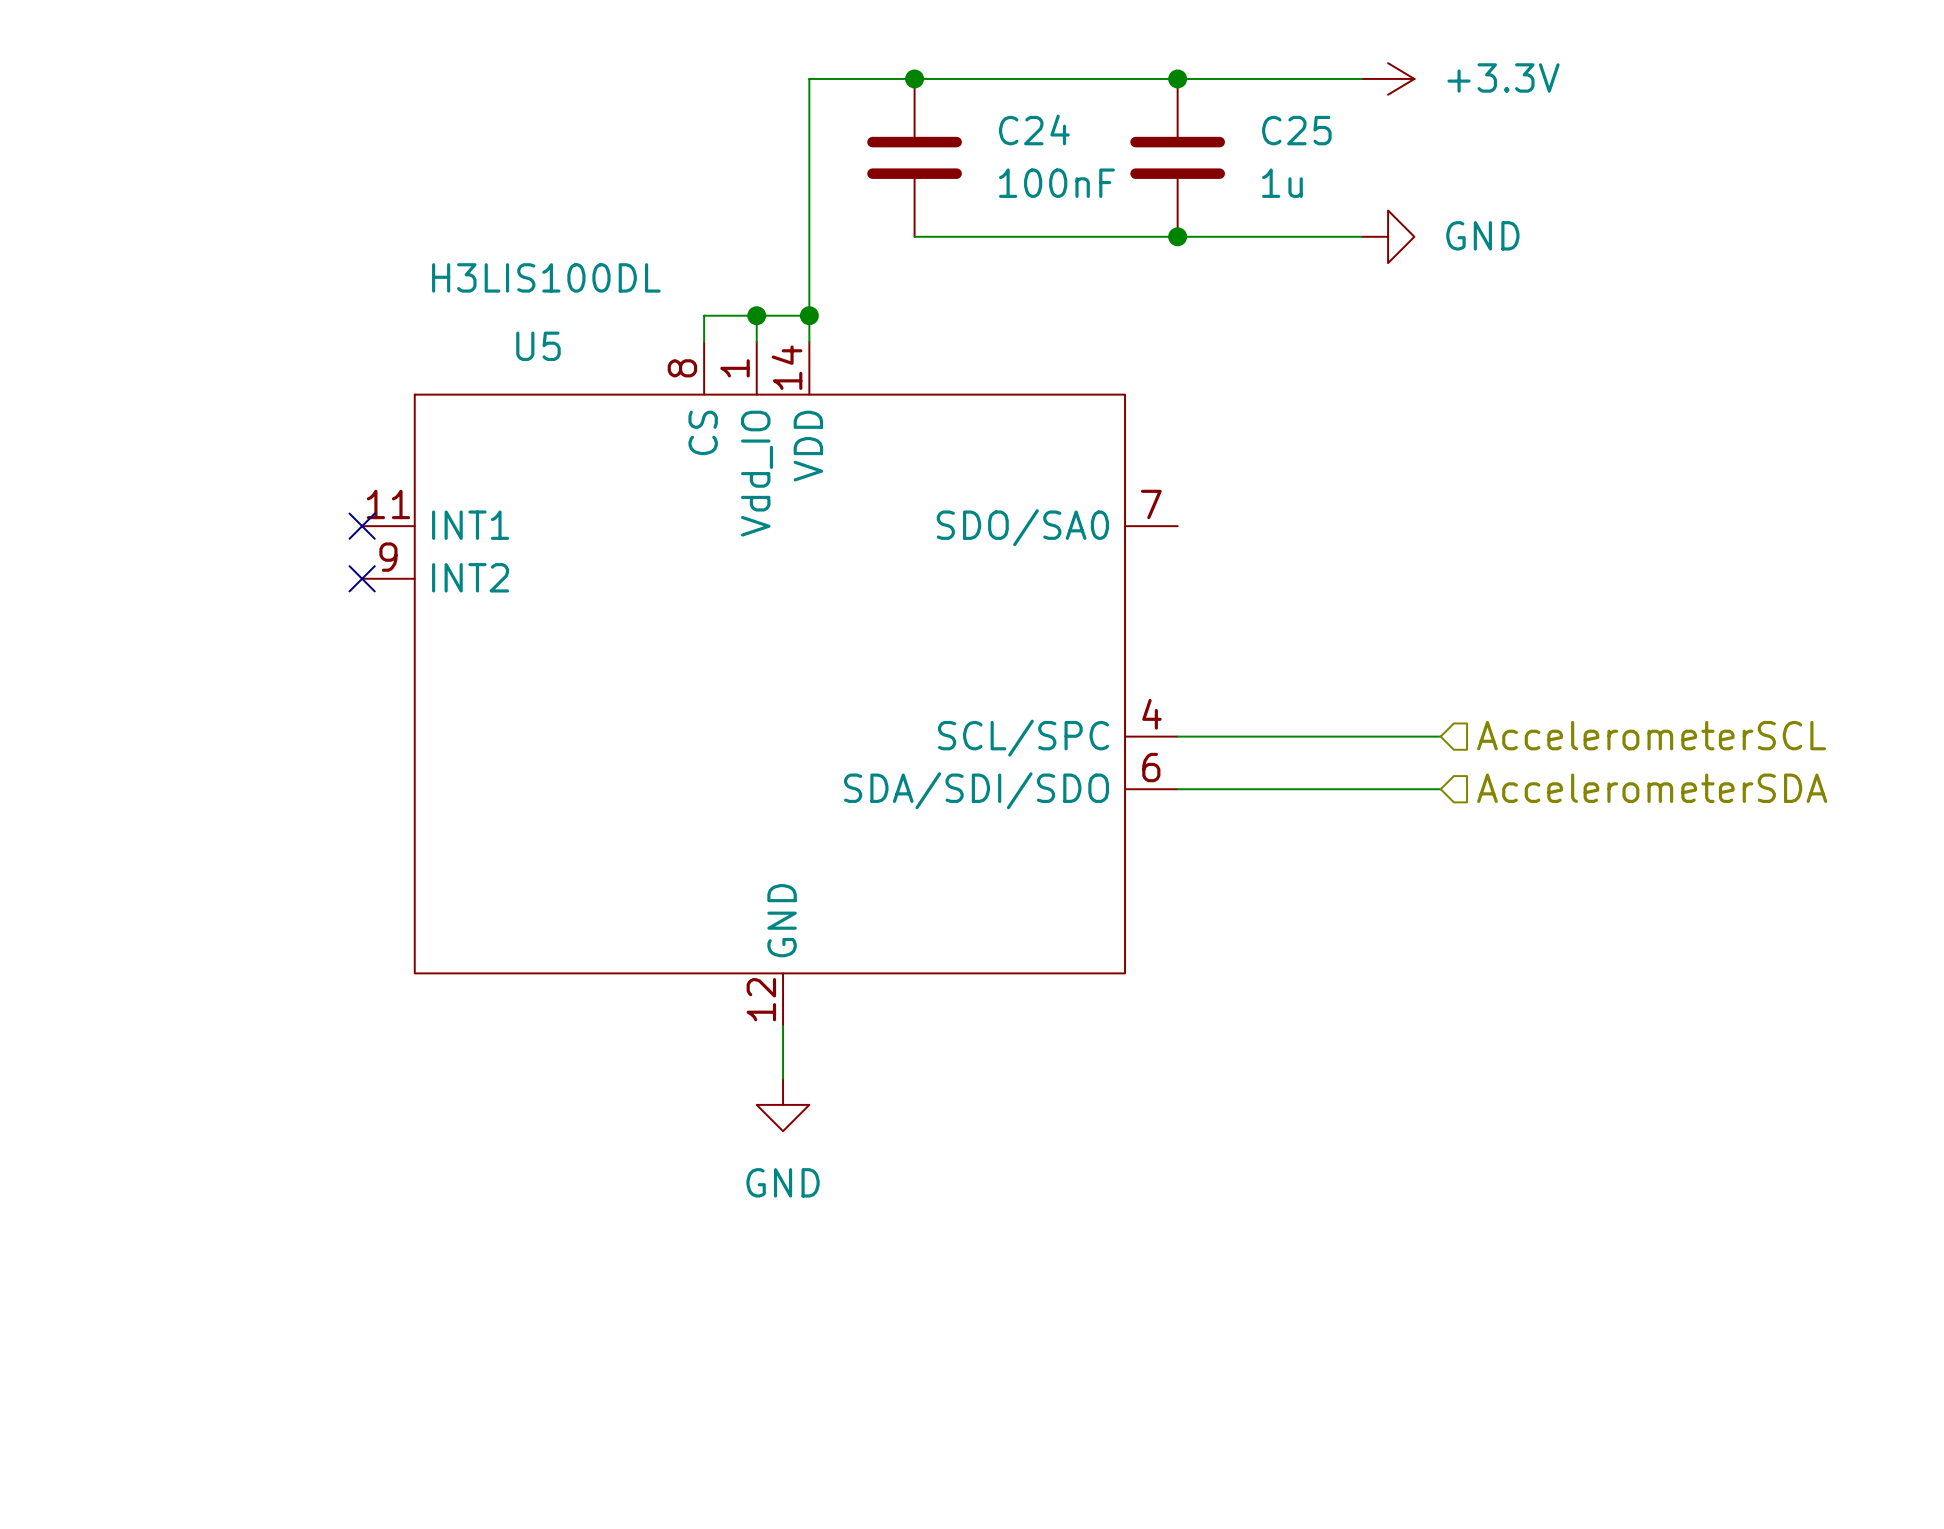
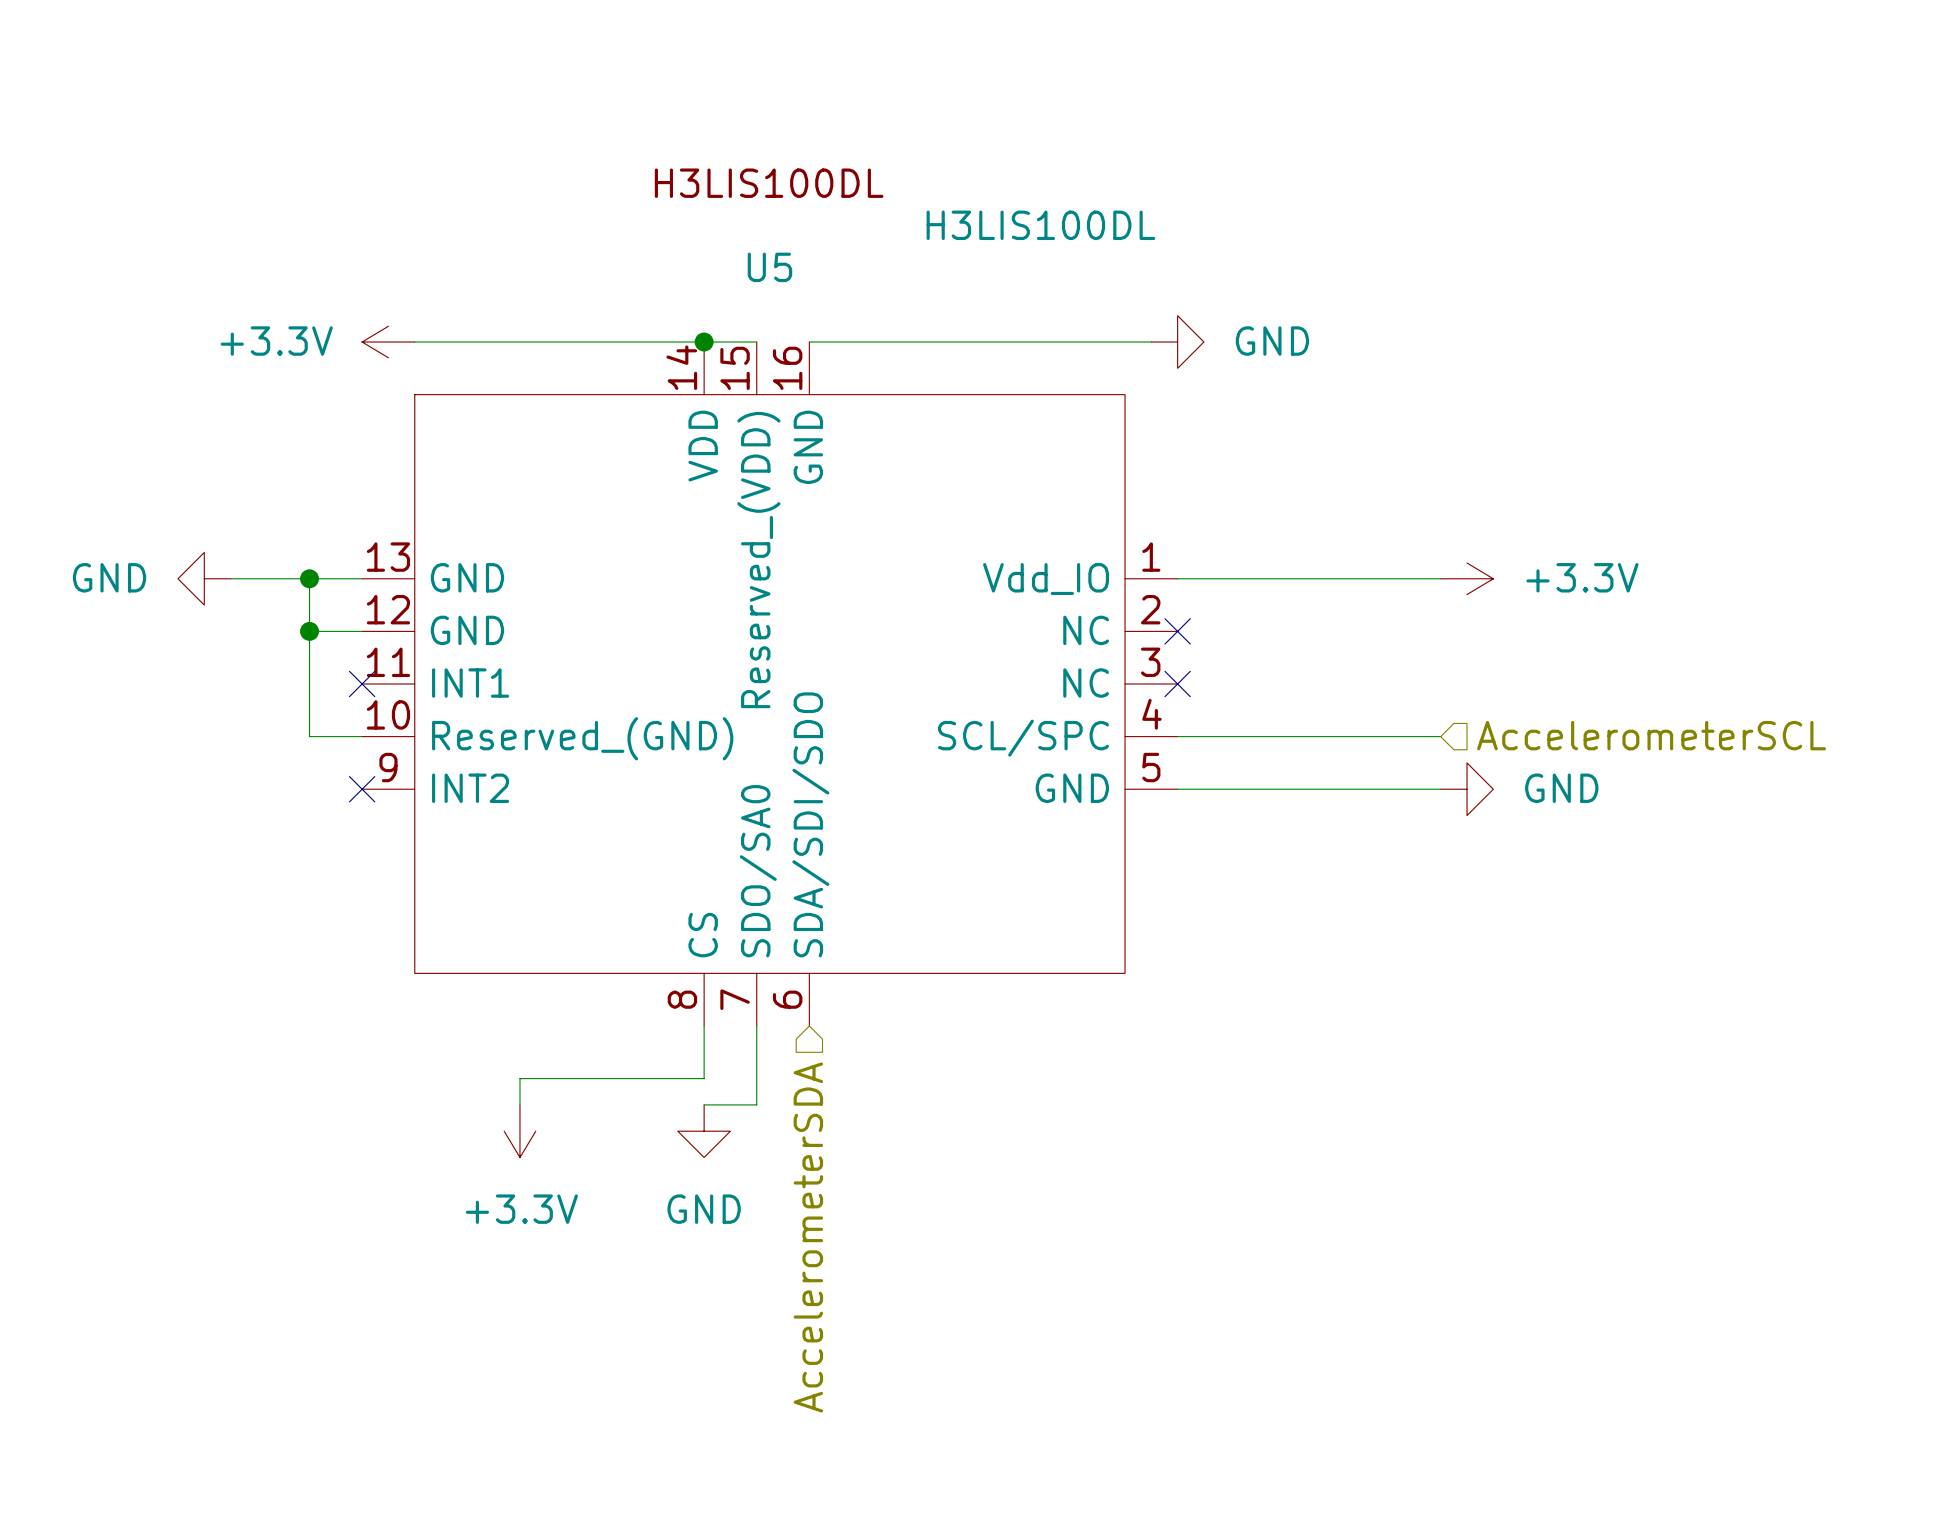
junction: (914, 78) -> none
junction: (1177, 78) -> none
wire: (1361, 78) (809, 78) (809, 342) -> (1151, 342) (809, 342)
power symbol position: +3.3V (1388, 78) -> +3.3V (1467, 578)
C24: 100nF (914, 157) -> none
C25: 1u (1177, 157) -> none
wire: (914, 236) (1361, 236) -> none
junction: (1177, 236) -> none
power symbol position: GND (1388, 236) -> GND (1177, 342)
U5 value position: H3LIS100DL (546, 277) -> H3LIS100DL (1040, 225)
wire: (756, 315) (756, 342) -> (414, 342) (756, 342)
junction: (756, 315) -> none
wire: (809, 315) (704, 315) (704, 342) -> none
junction: (809, 315) -> none
U5 symbol: [362, 342, 1178, 1026] -> [362, 342, 1178, 1026]
power symbol: none -> +3.3V (388, 342)
junction: none -> (704, 342)
U5 name position: U5 (538, 346) -> U5 (769, 267)
no-connect mark: (362, 526) -> none
power symbol: none -> GND (204, 578)
wire: none -> (230, 578) (362, 578)
wire: none -> (309, 578) (309, 736) (362, 736)
junction: none -> (309, 578)
no-connect mark: (362, 578) -> none
wire: none -> (1177, 578) (1440, 578)
wire: none -> (309, 631) (362, 631)
junction: none -> (309, 631)
no-connect mark: none -> (1177, 631)
no-connect mark: none -> (362, 684)
no-connect mark: none -> (1177, 684)
hierarchical label: AccelerometerSDA (1652, 788) -> none
no-connect mark: none -> (362, 789)
power symbol: none -> GND (1467, 789)
wire: none -> (704, 1025) (704, 1078) (519, 1078) (519, 1104)
wire: none -> (756, 1025) (756, 1104) (704, 1104)
wire: (783, 1025) (783, 1078) -> none
power symbol position: GND (783, 1104) -> GND (704, 1131)
power symbol: none -> +3.3V (519, 1131)
hierarchical label: none -> AccelerometerSDA (808, 1237)

